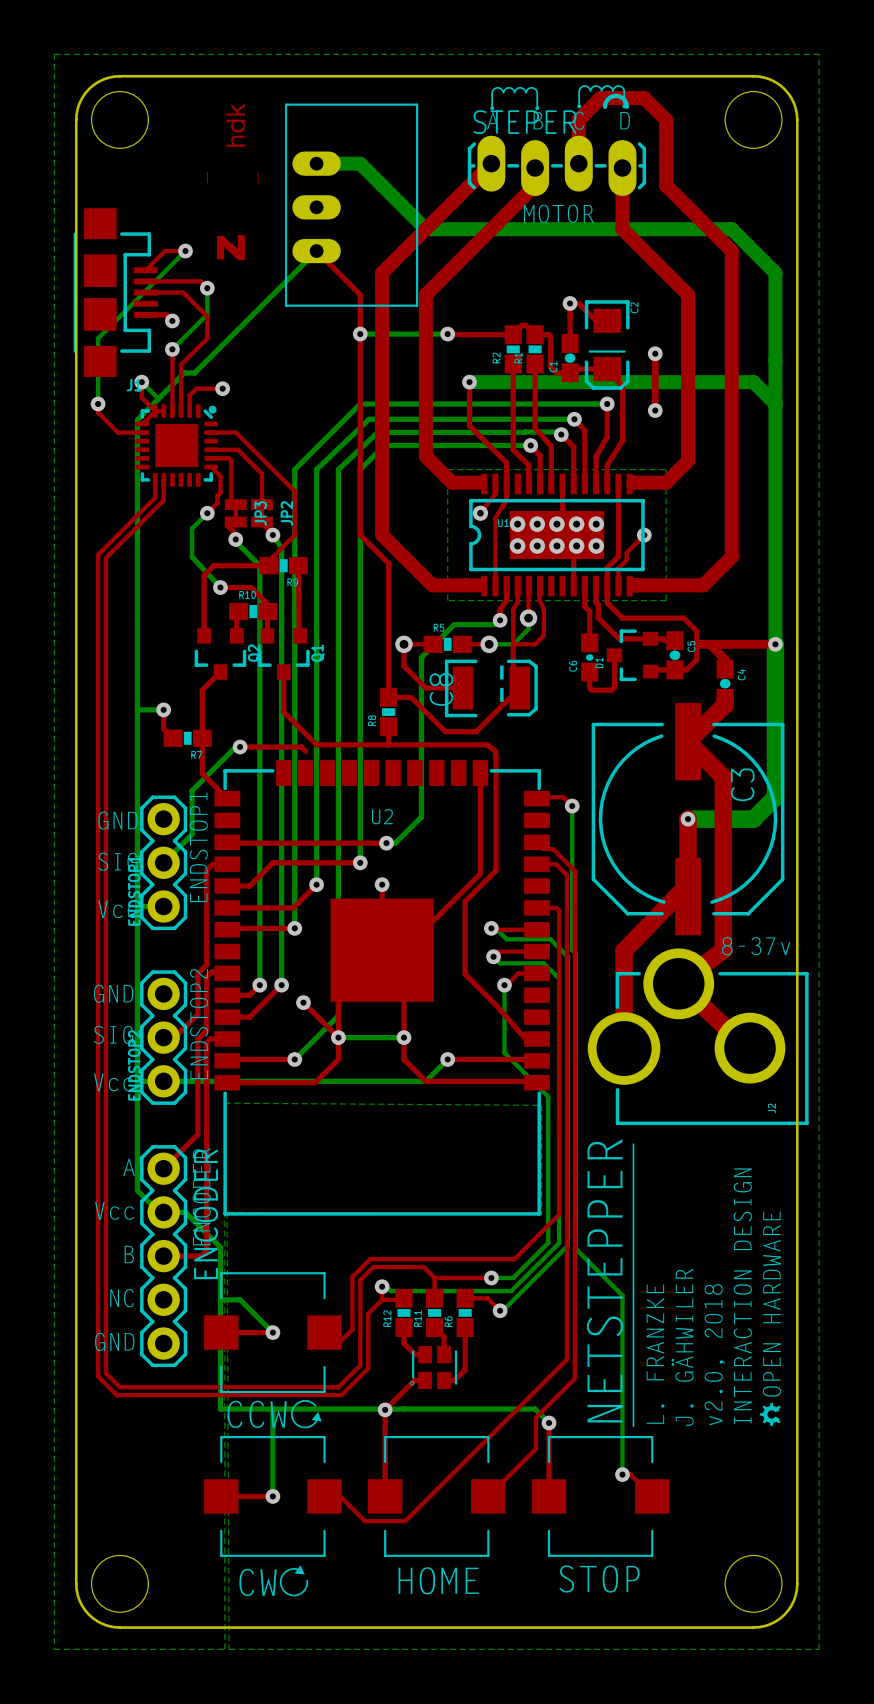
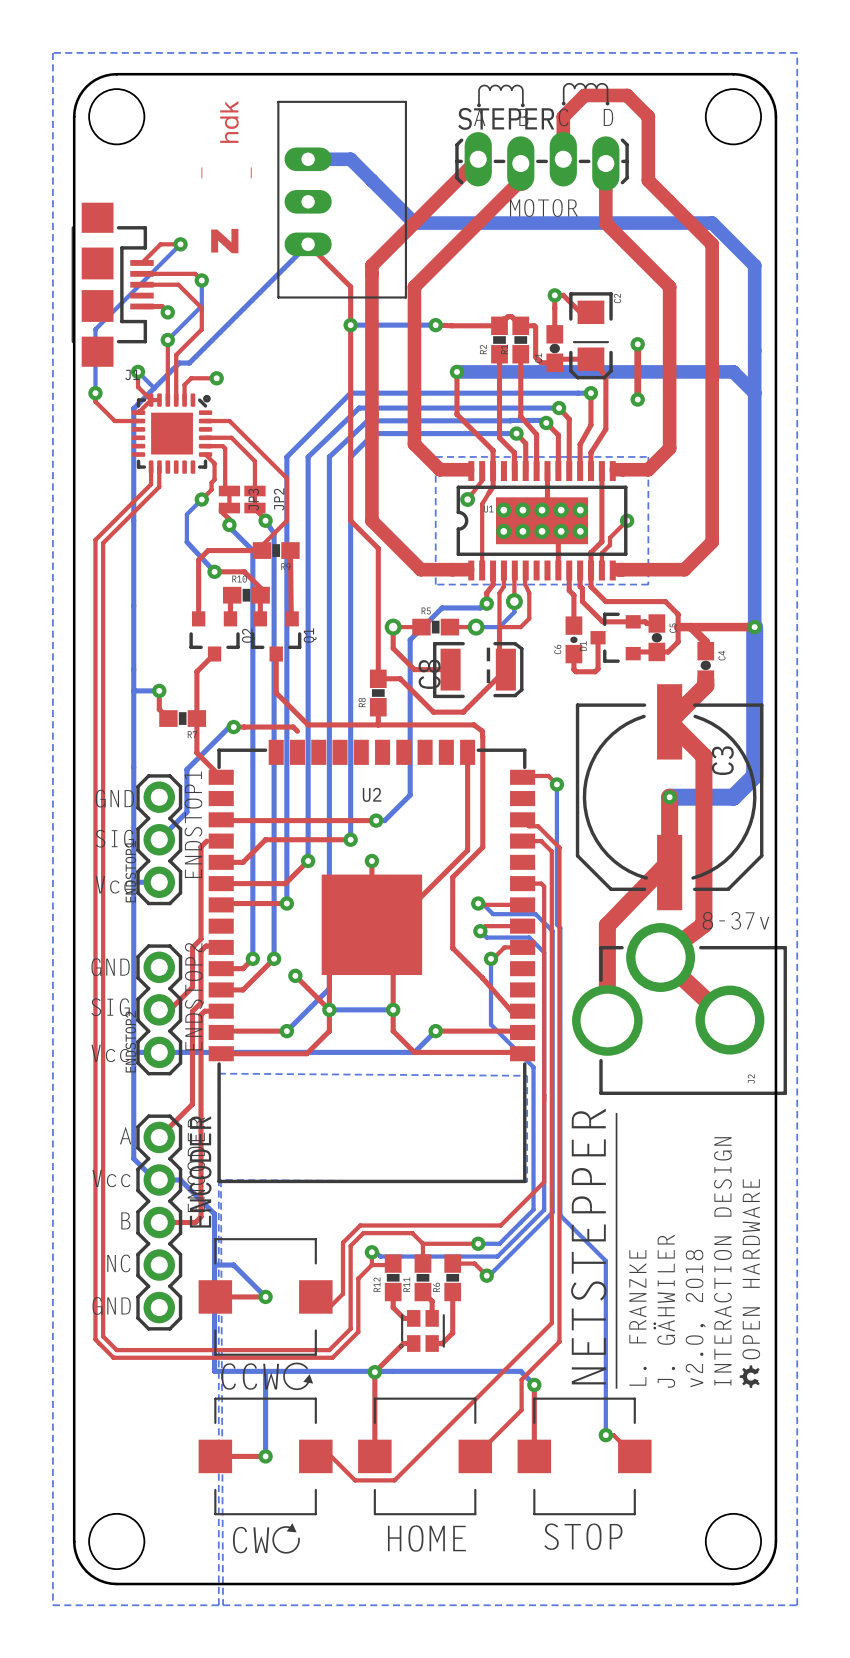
line: (605, 106) (608, 99) (615, 95) (623, 99) (626, 106) -> none

